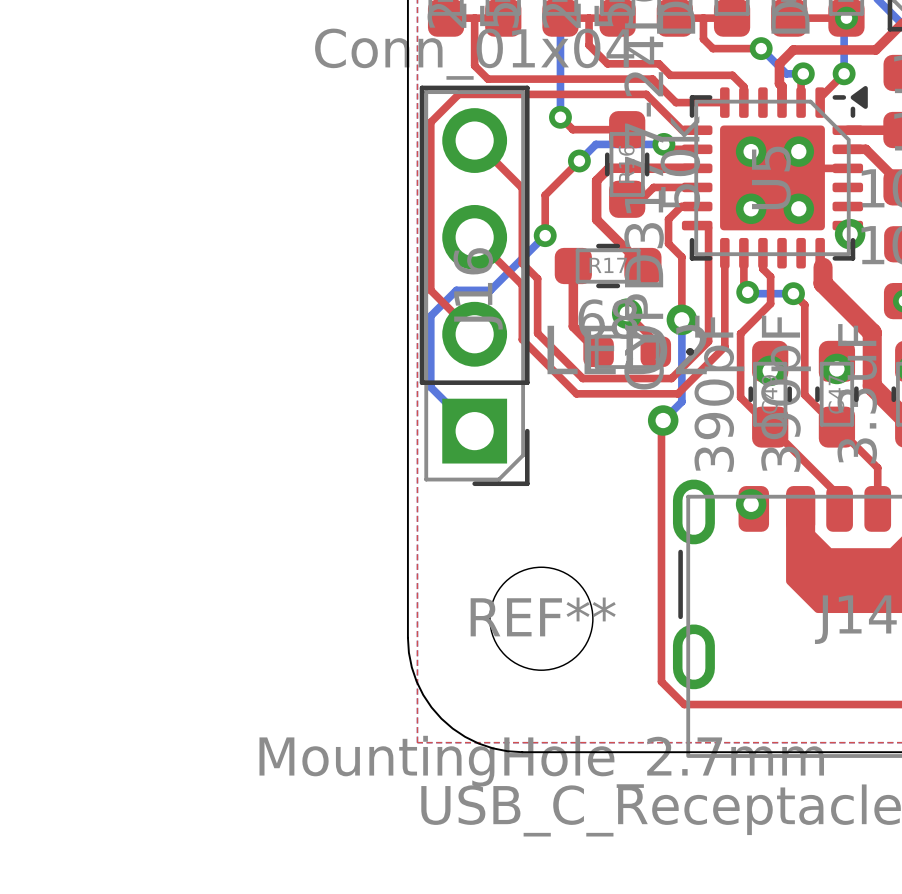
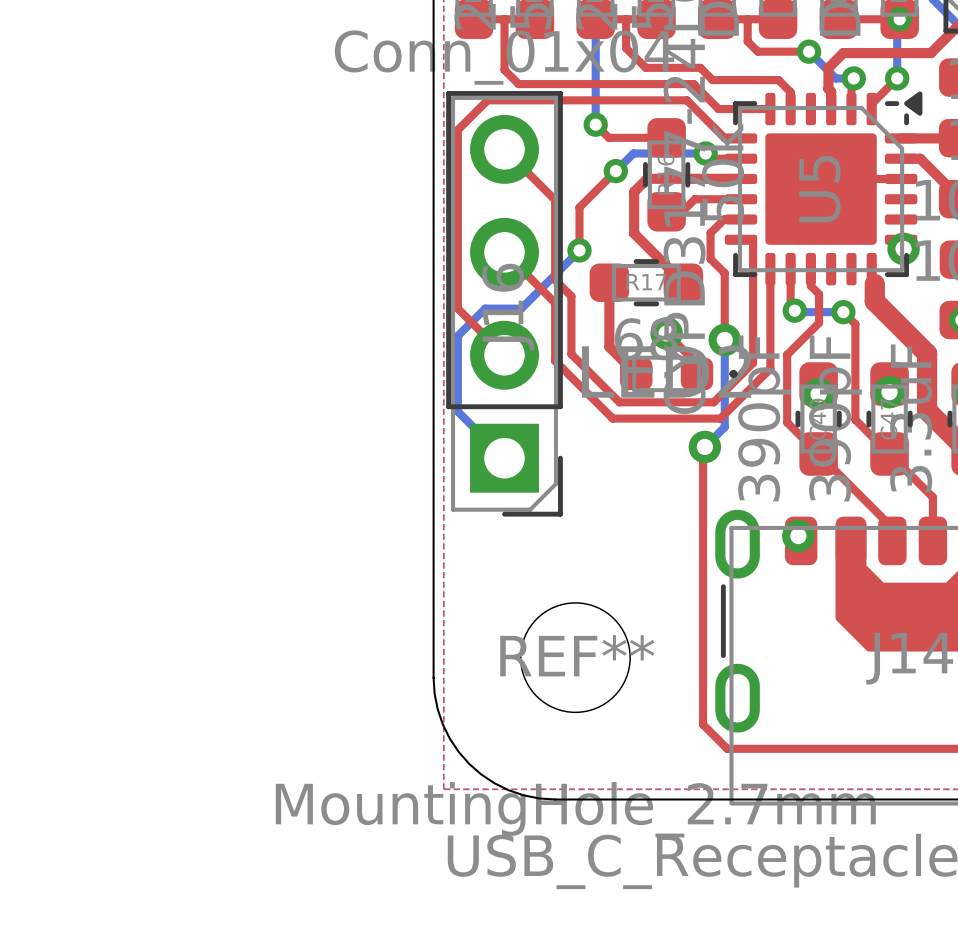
via: (751, 151) -> none
via: (798, 151) -> none
via: (751, 208) -> none
via: (798, 208) -> none

